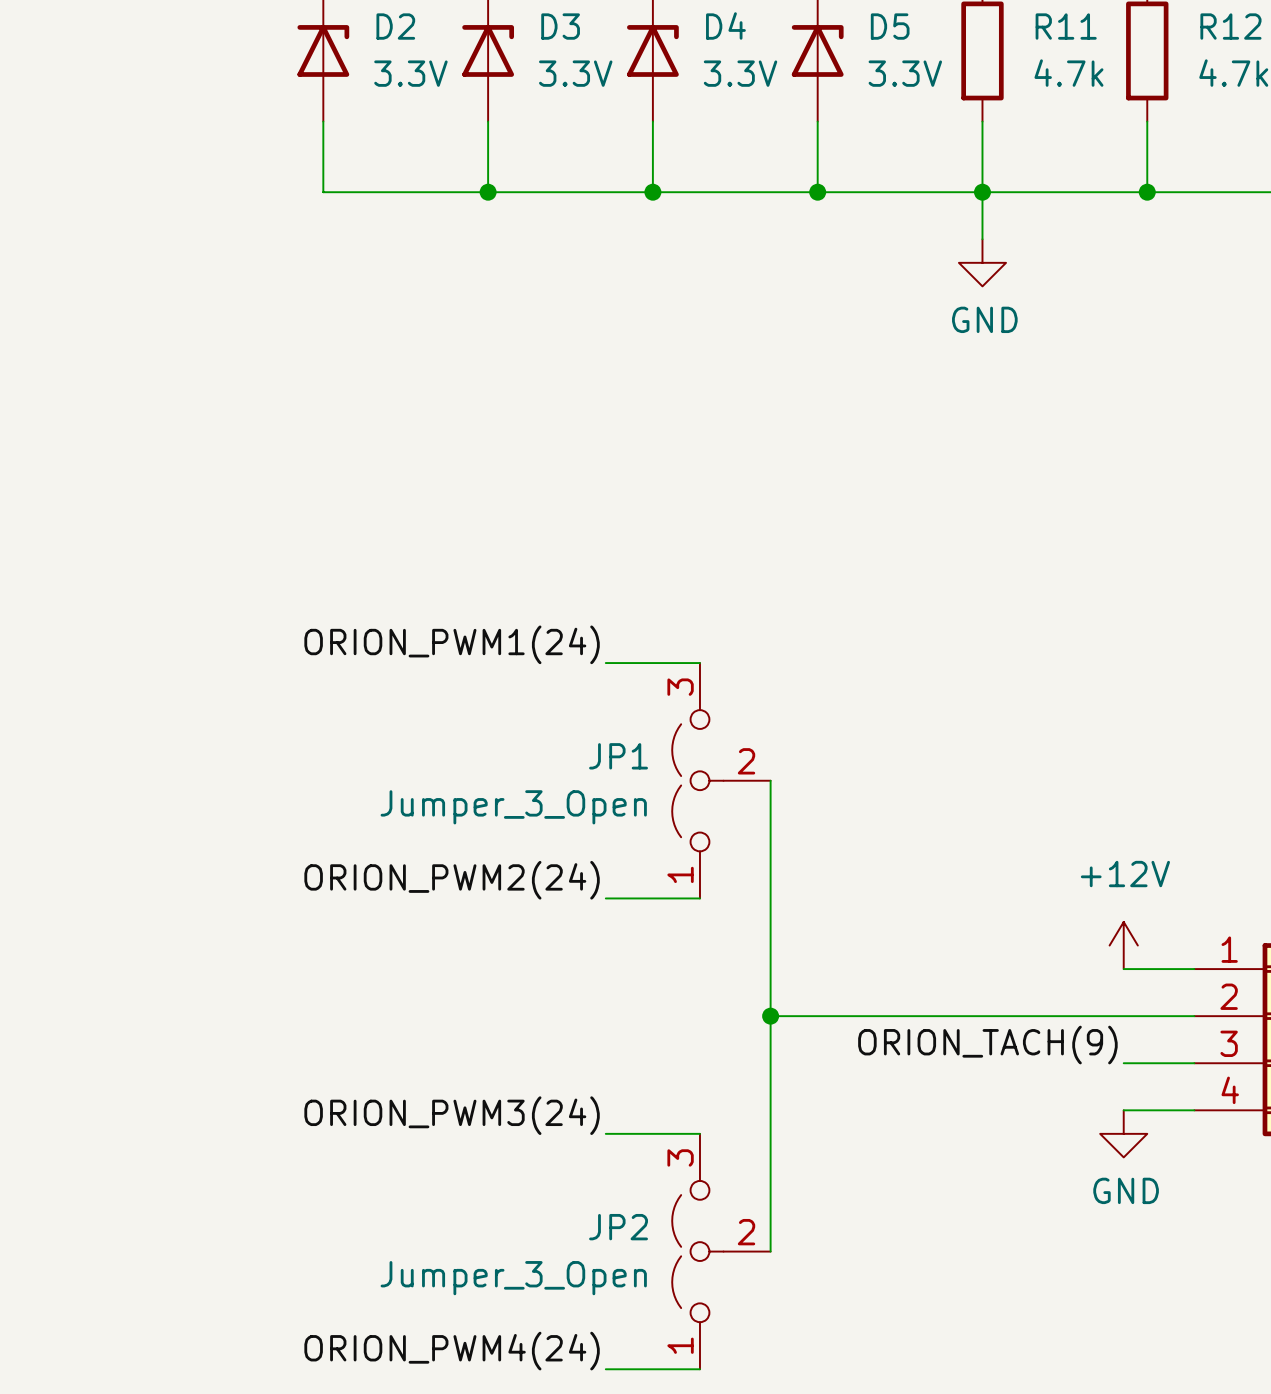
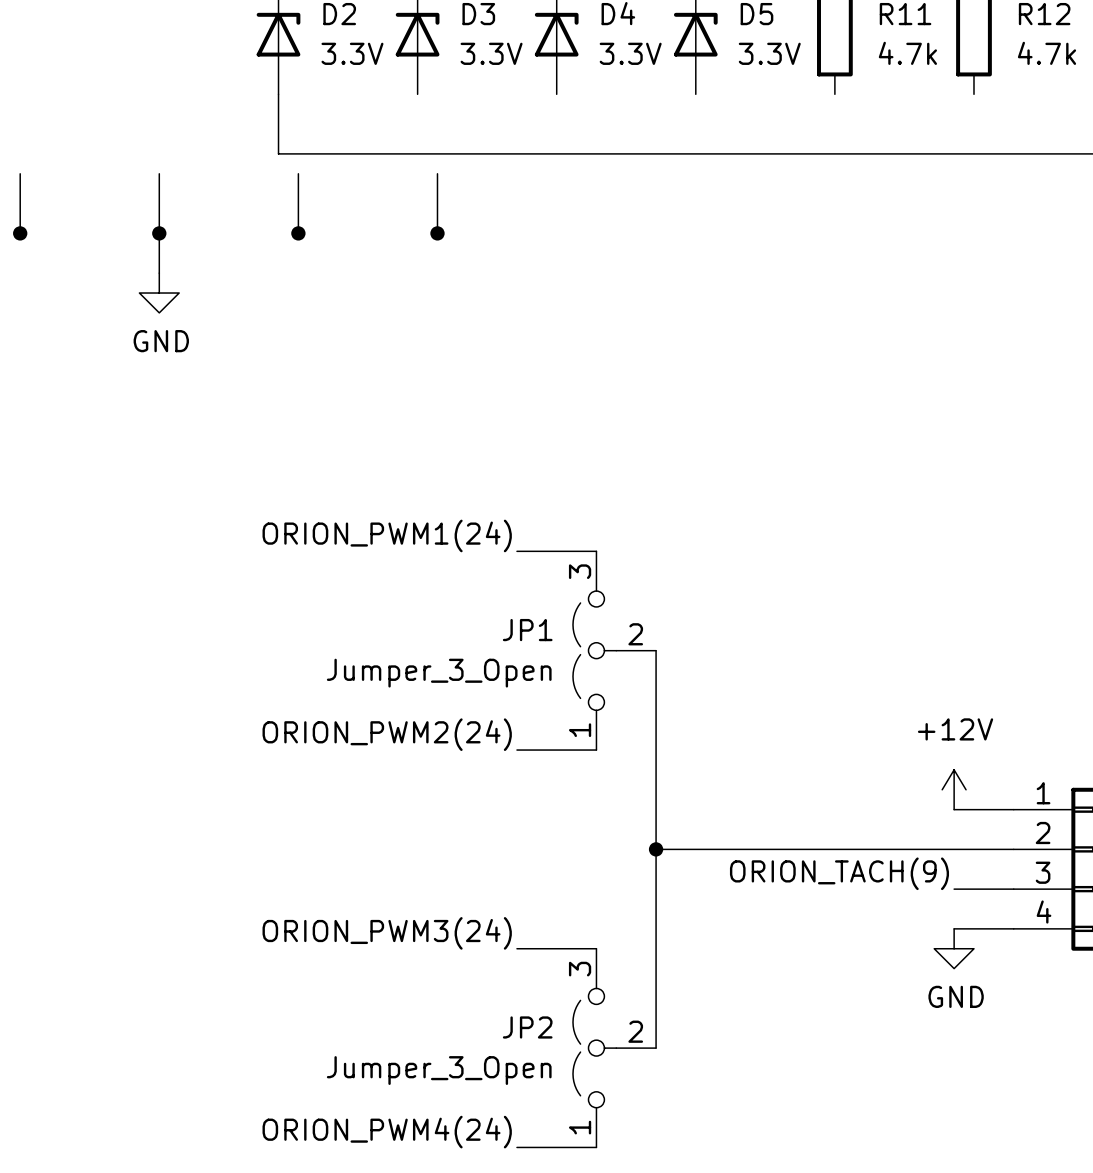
wire: (488, 121) (488, 192) -> (298, 173) (298, 233)
wire: (652, 121) (652, 192) -> (437, 173) (437, 233)
wire: (817, 121) (817, 192) -> none
wire: (982, 121) (982, 239) -> none
wire: (1147, 121) (1147, 192) -> none
junction: (488, 192) -> none
junction: (652, 192) -> none
junction: (817, 192) -> none
junction: (982, 192) -> none
junction: (1147, 192) -> none
wire: none -> (20, 173) (20, 233)
wire: none -> (159, 173) (159, 273)
power symbol: GND (982, 262) -> none
junction: none -> (20, 233)
junction: none -> (159, 233)
junction: none -> (298, 233)
junction: none -> (437, 233)
power symbol: none -> GND (159, 293)

